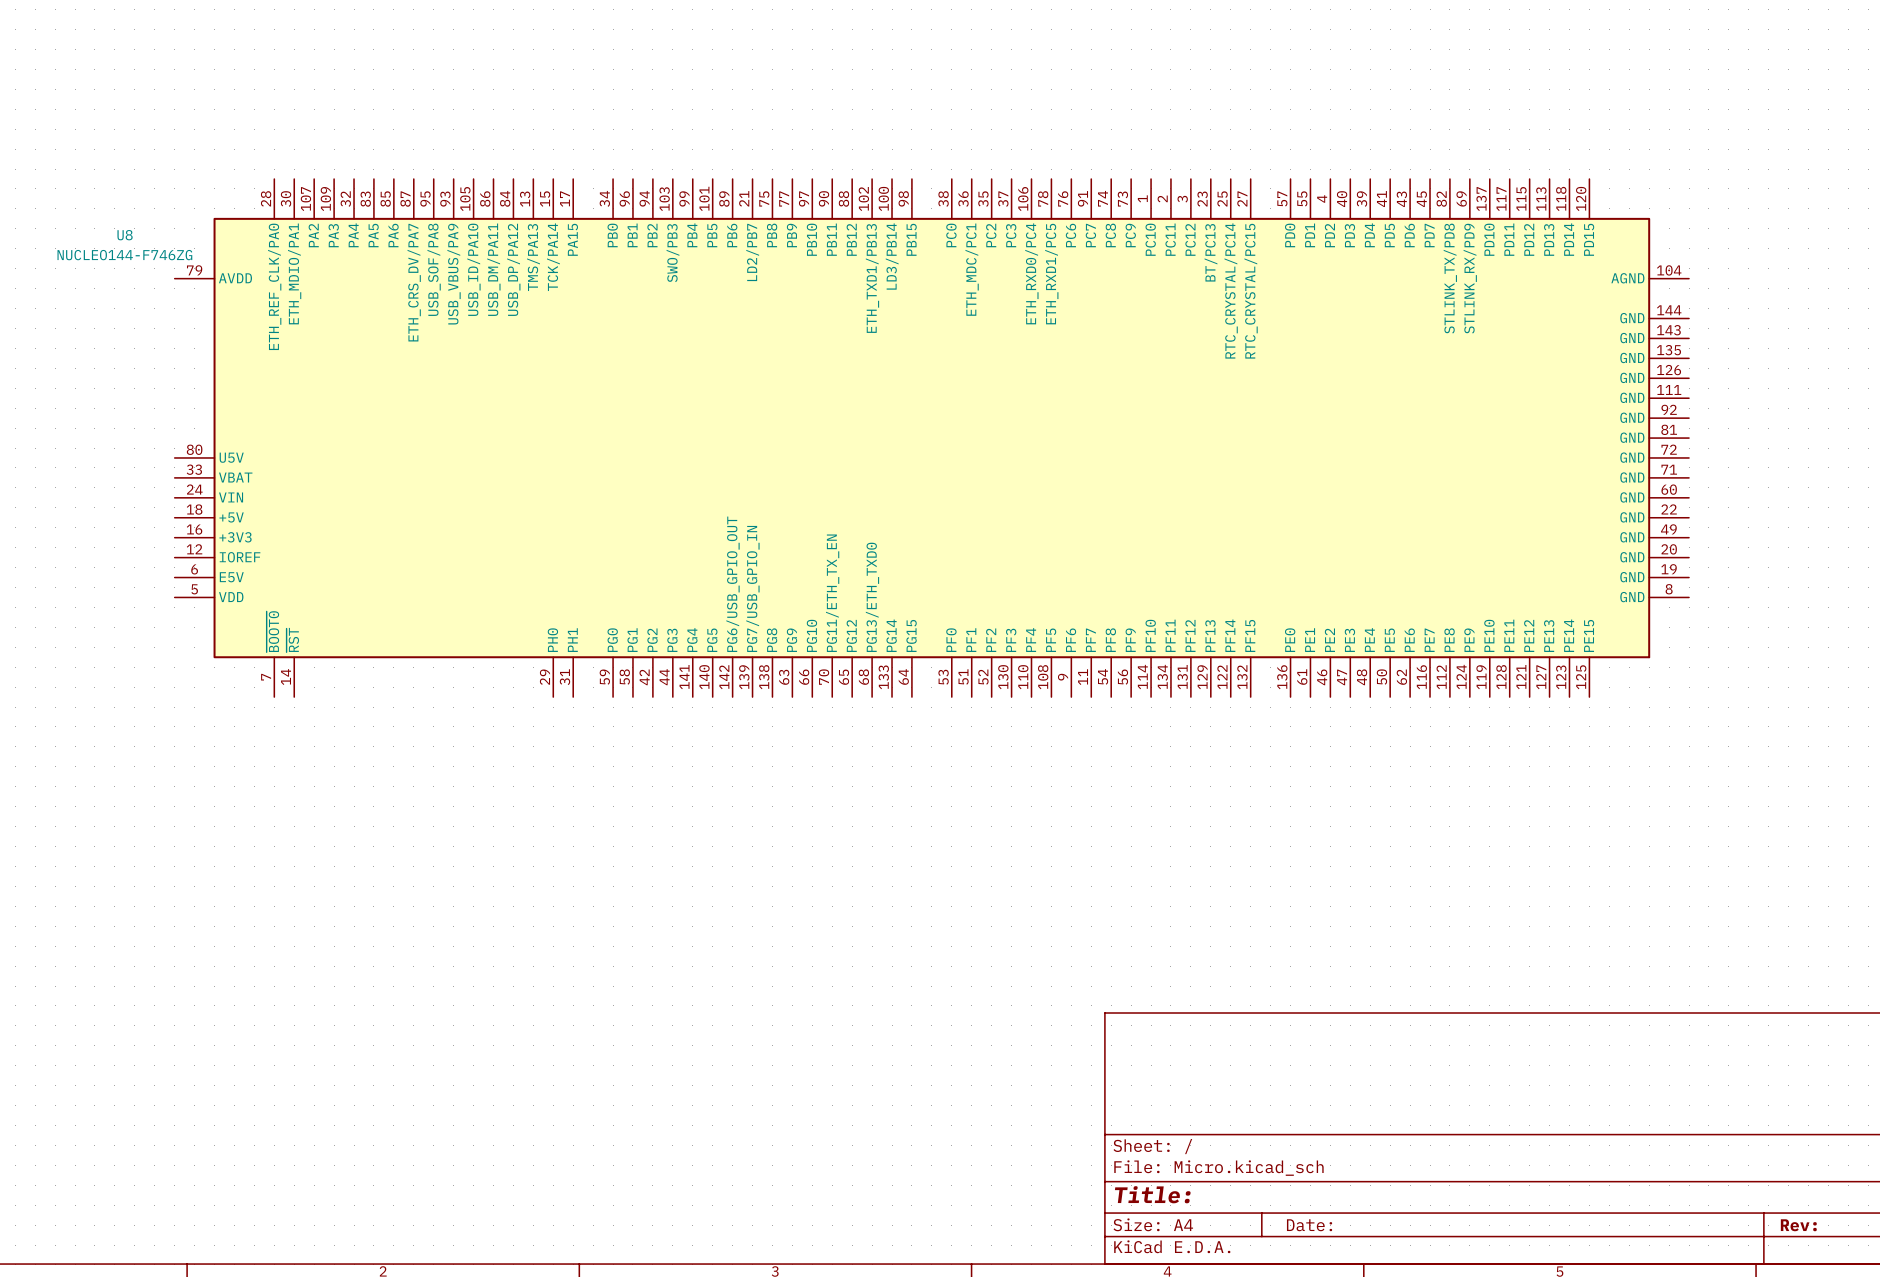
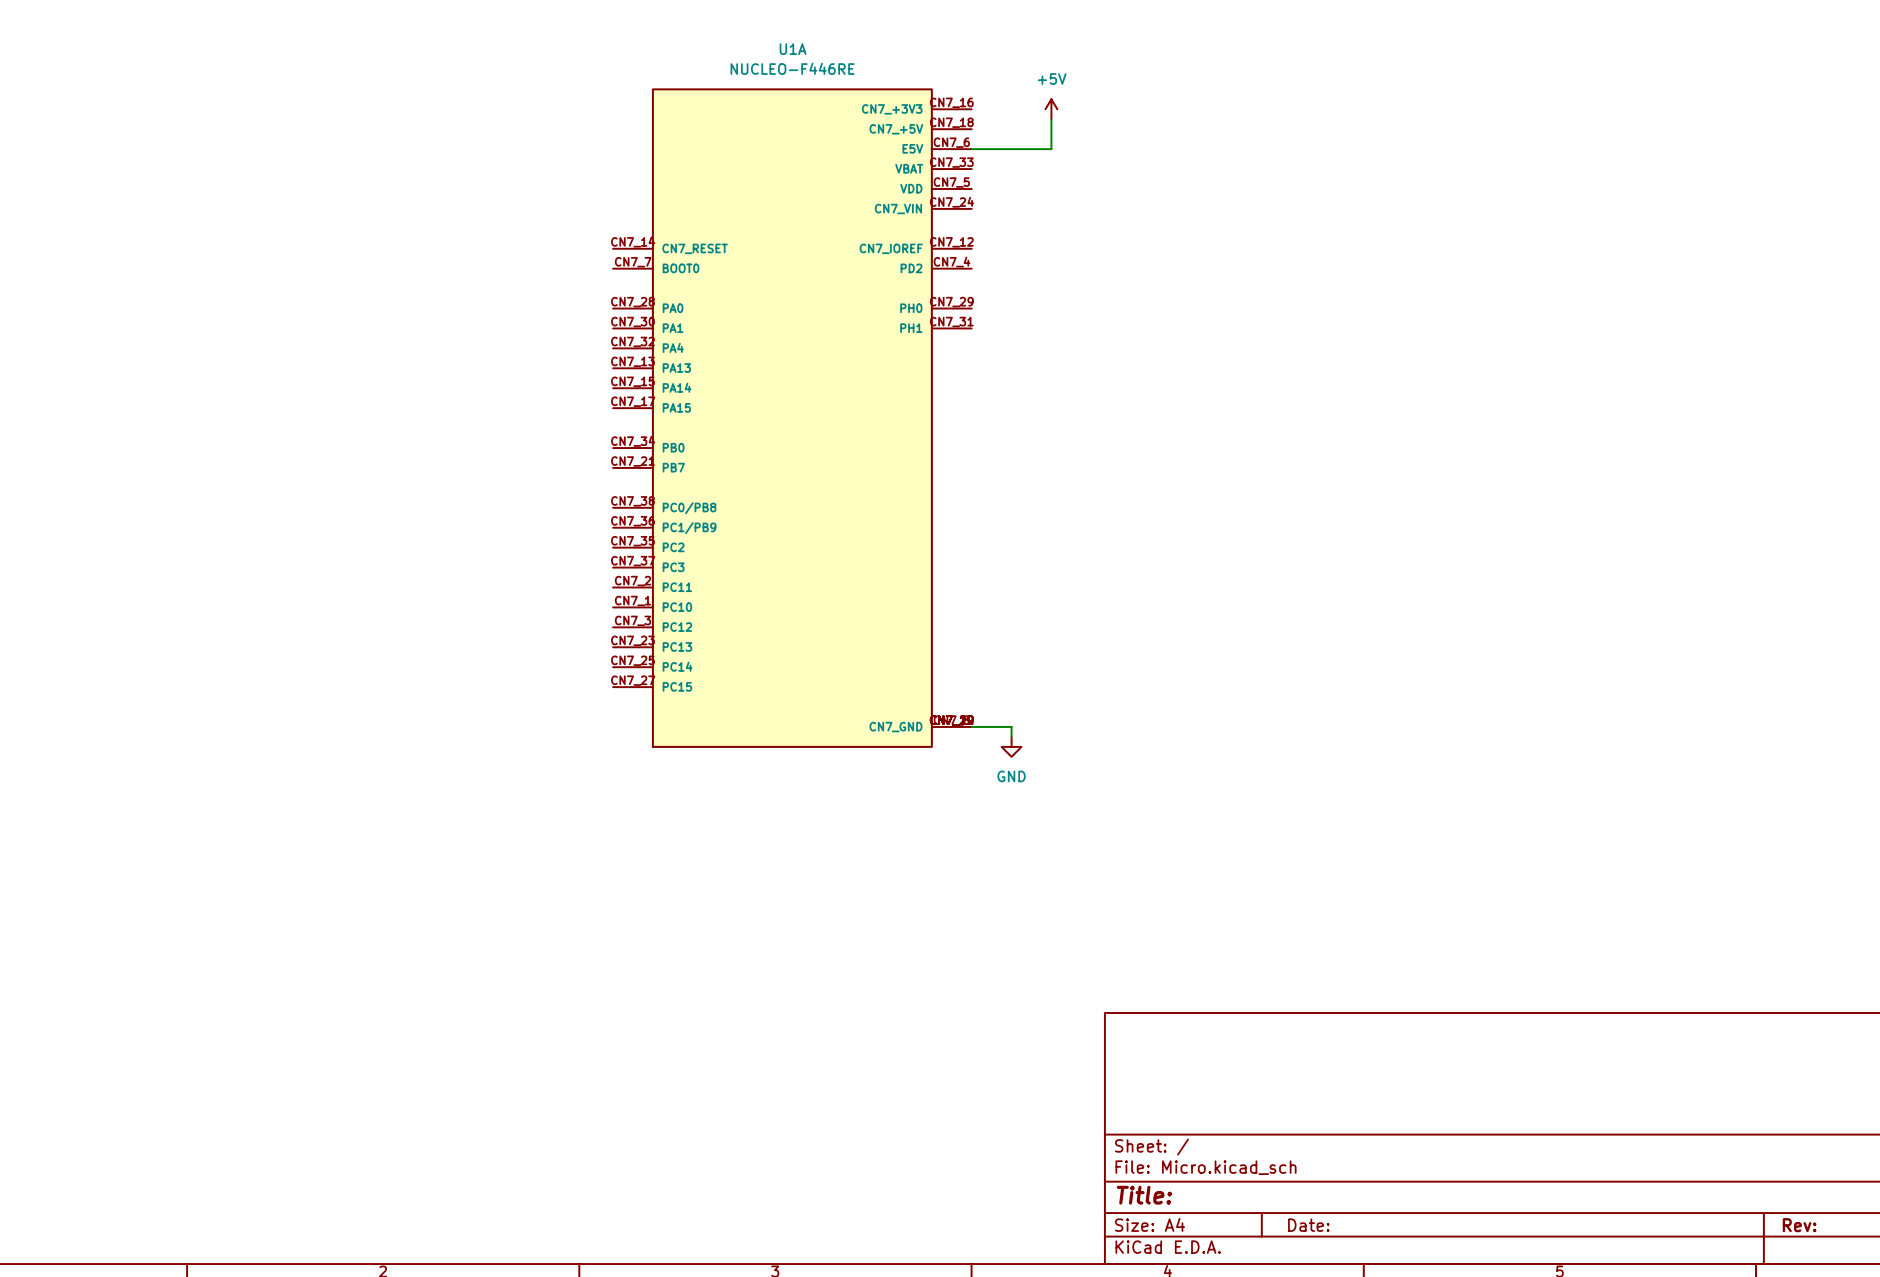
power symbol: none -> +5V (1051, 109)
wire: none -> (1051, 119) (1051, 149) (971, 149)
U1A: none -> NUCLEO-F446RE (792, 418)
U8: NUCLEO144-F746ZG (931, 438) -> none
wire: none -> (971, 726) (1011, 726) (1011, 736)
power symbol: none -> GND (1011, 746)

